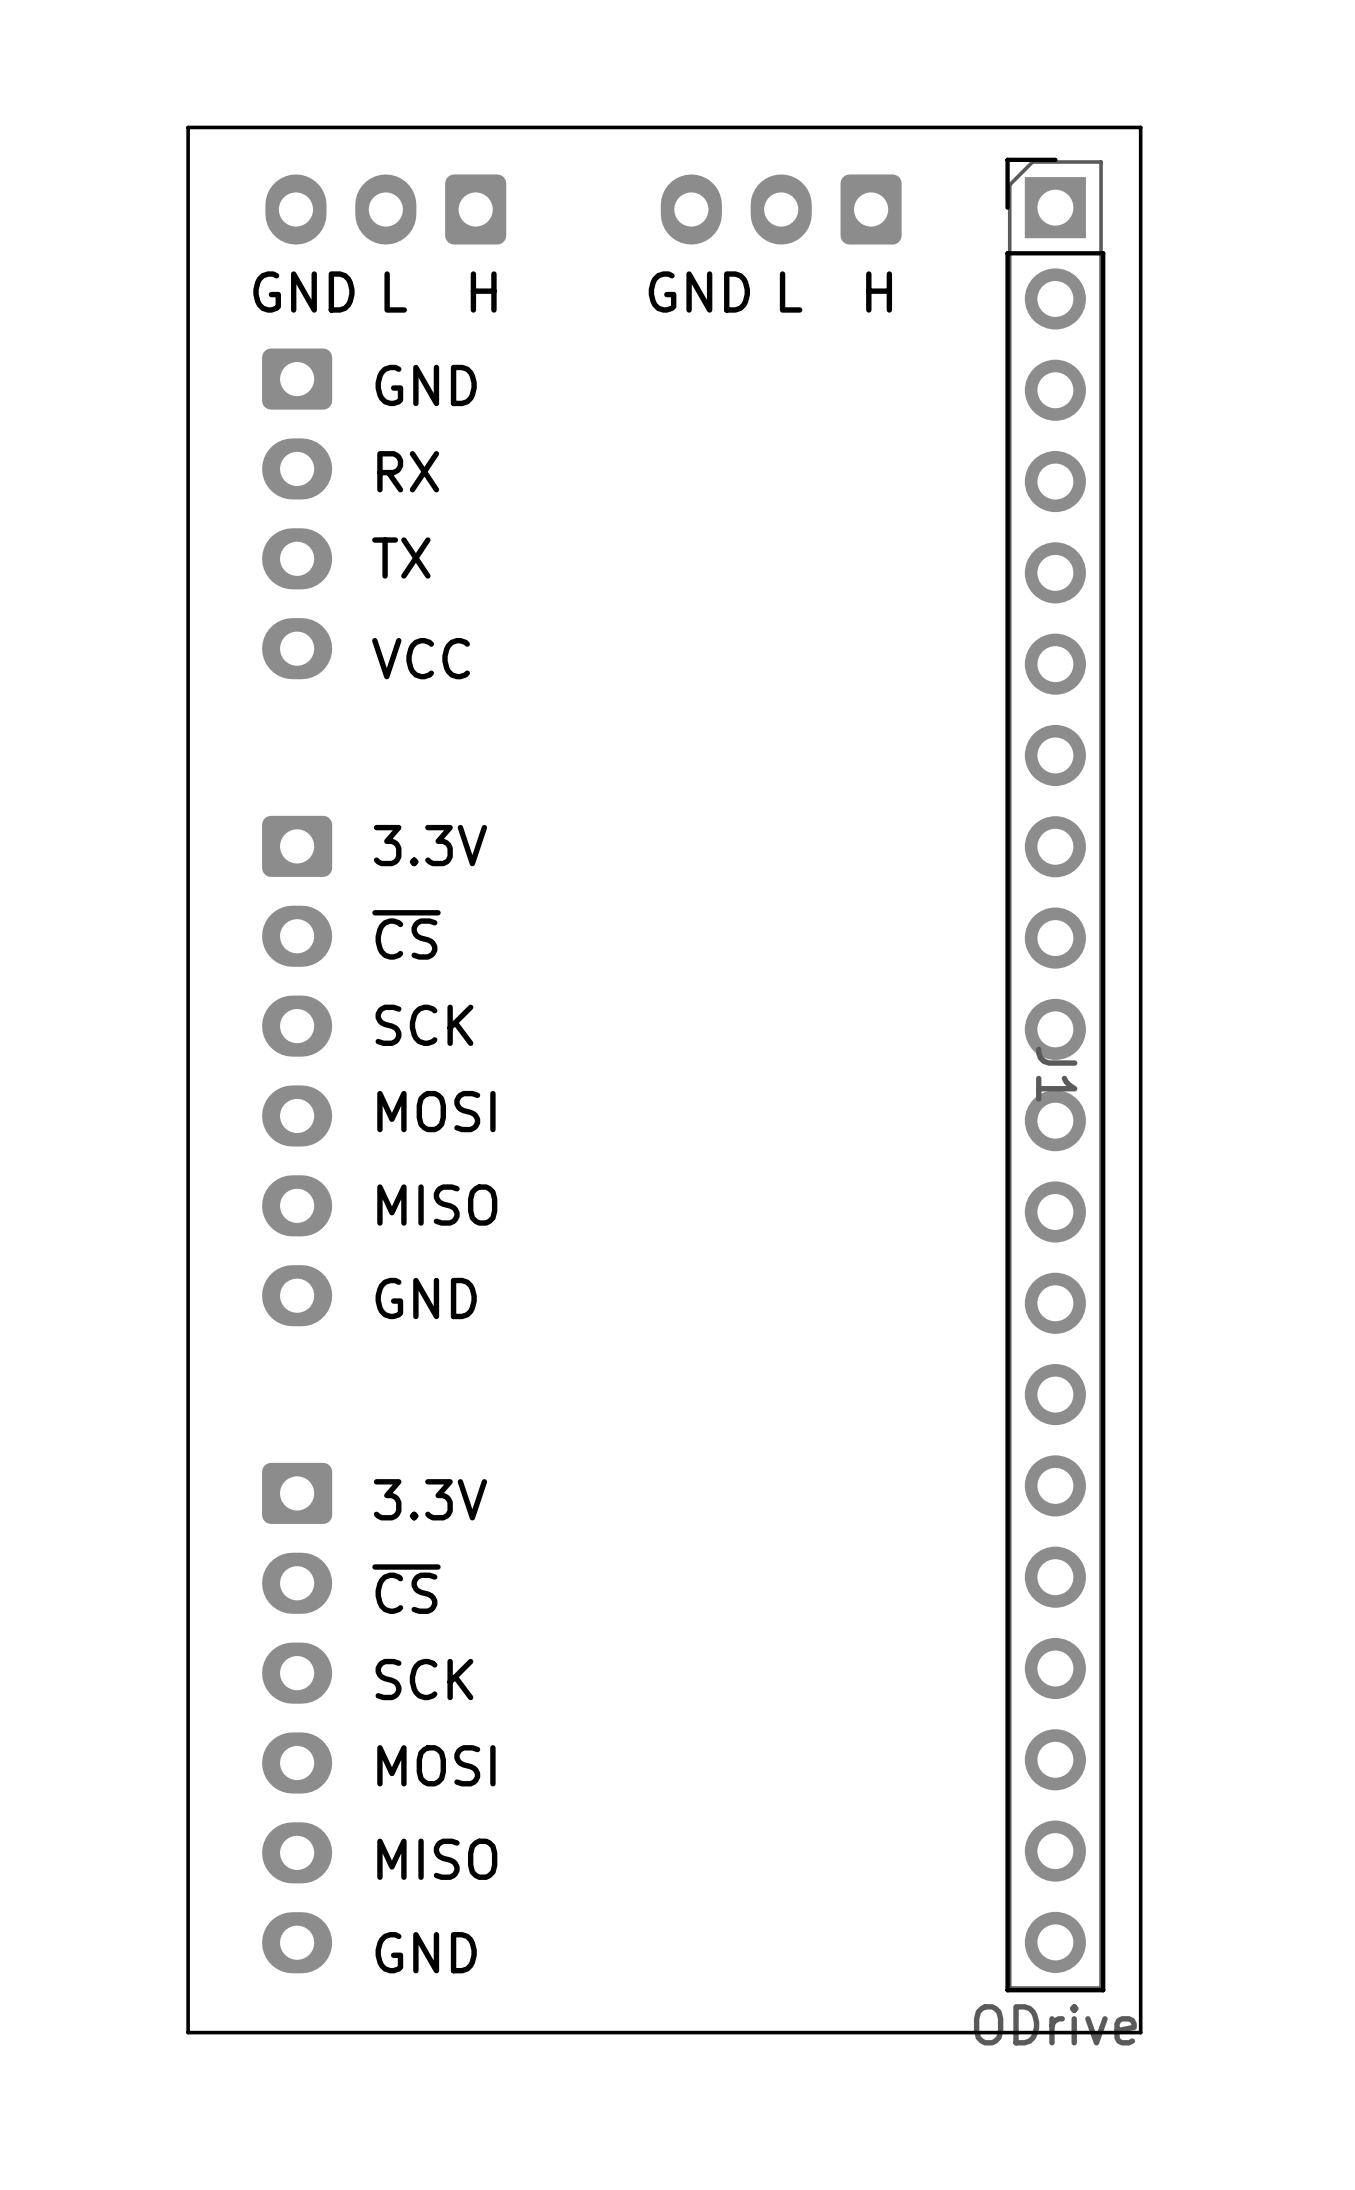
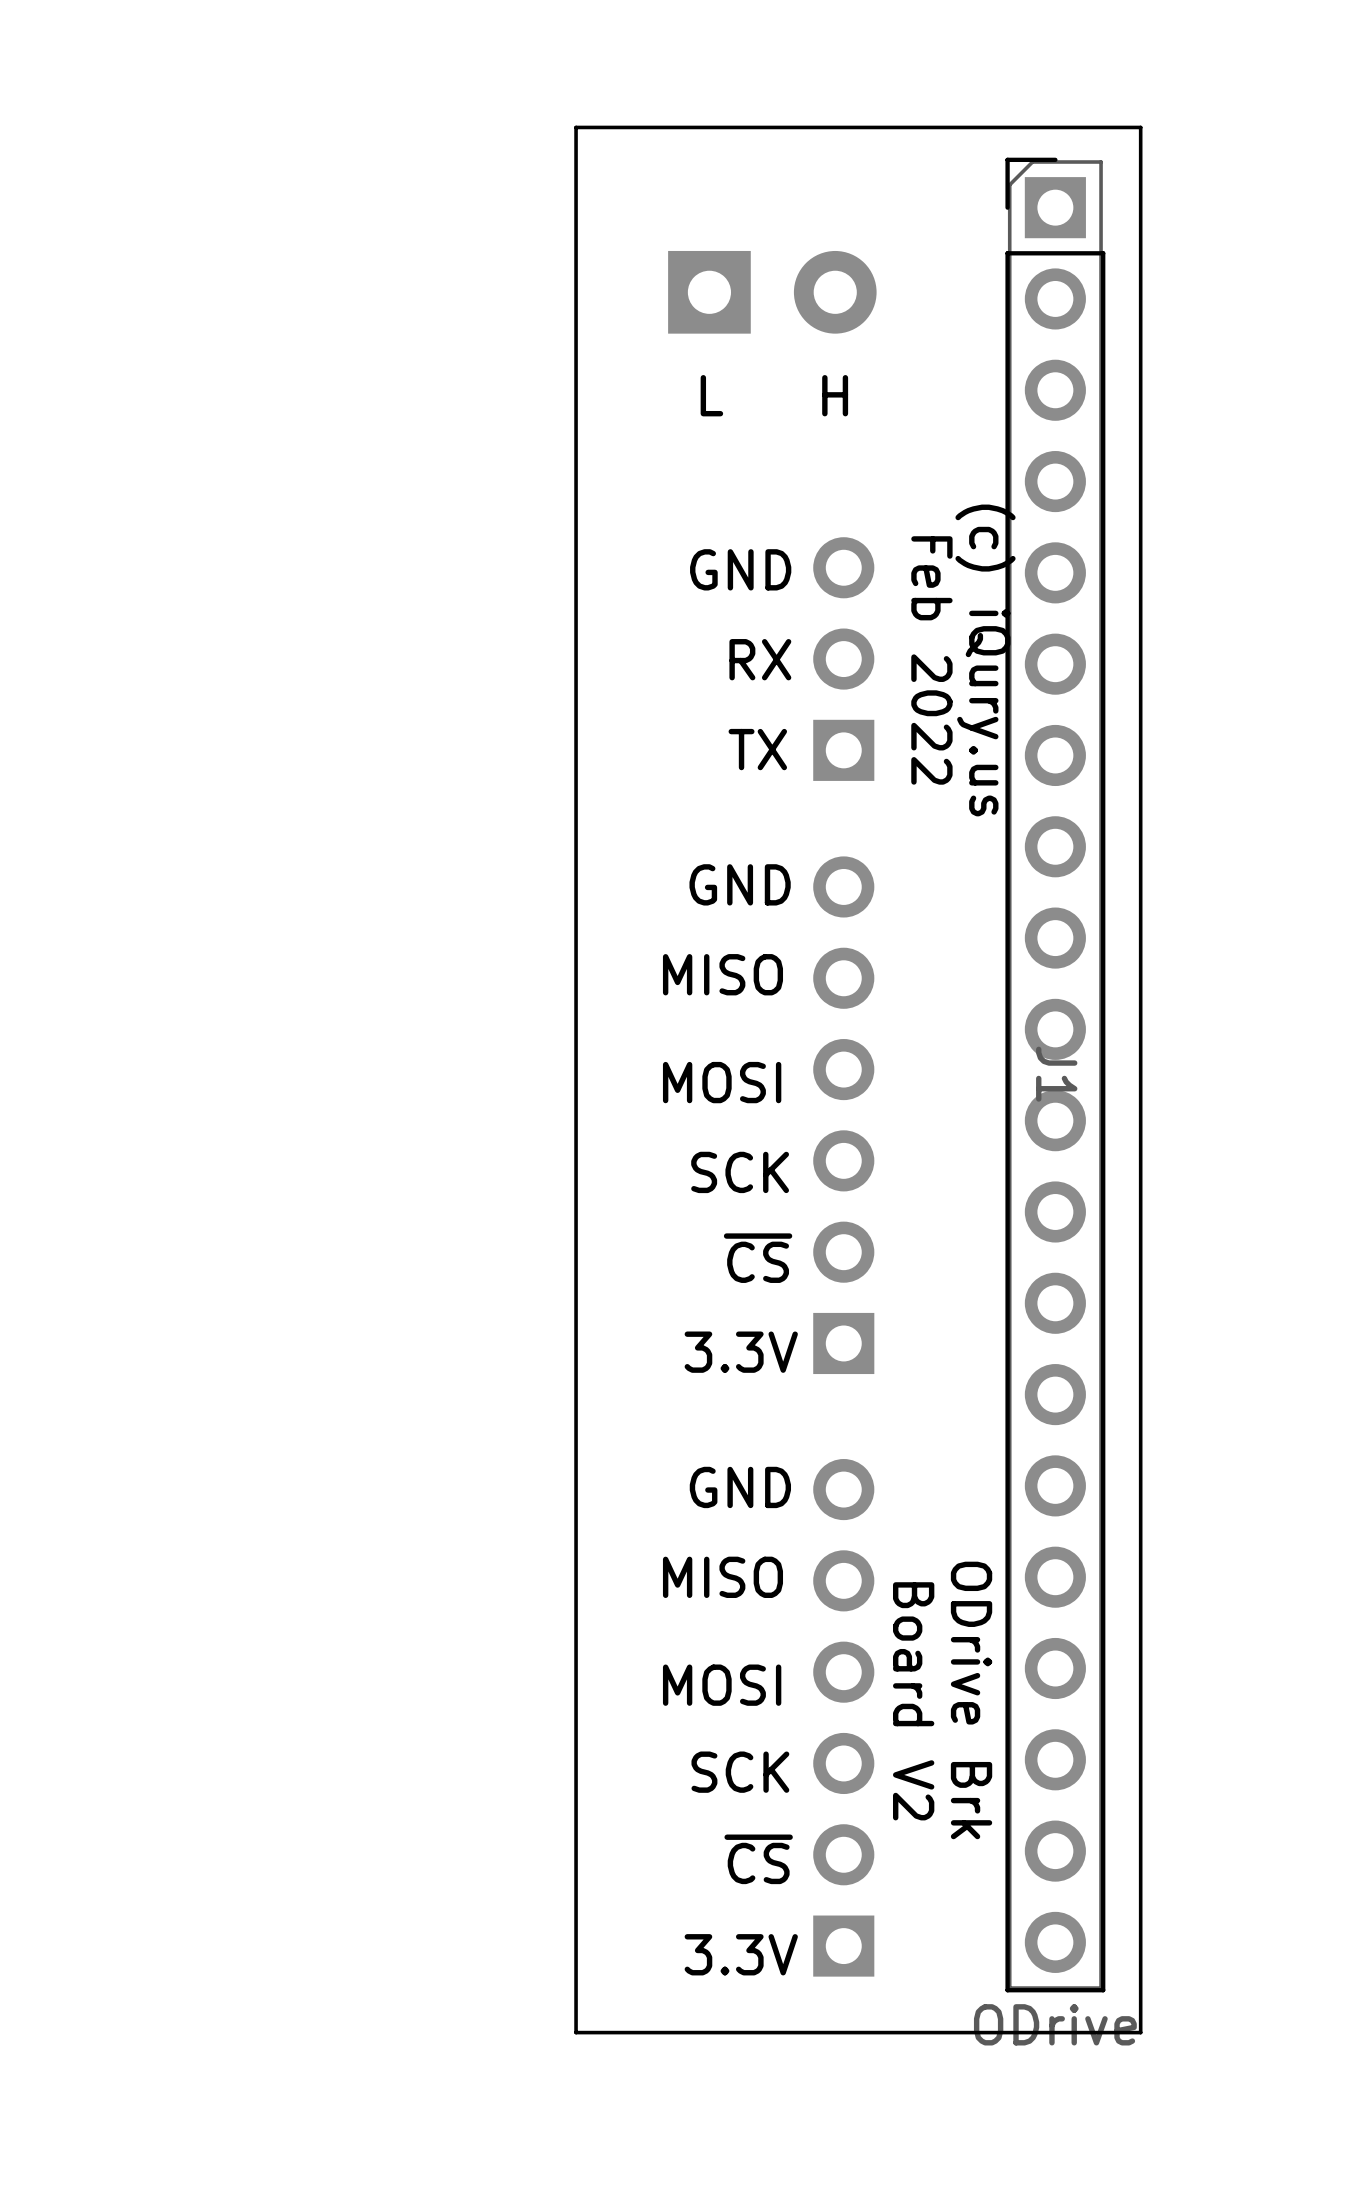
board edge: (576, 127) (188, 127) (188, 2032) (576, 2032) -> (576, 127) (576, 2032)
part: (385, 209) -> none
part: (781, 209) -> none
text: GND (303, 292) -> none
text: L (395, 292) -> none
text: H (483, 292) -> none
text: GND (699, 292) -> none
part: none -> (772, 292)
text position: L (791, 292) -> L (711, 395)
text position: H (879, 292) -> H (835, 395)
text: GND (426, 385) -> none
text position: RX (408, 471) -> RX (760, 659)
part: (297, 513) -> none
text position: TX (401, 558) -> TX (757, 749)
text: none -> GND (740, 569)
text: VCC (421, 658) -> none
part: none -> (843, 659)
text: none -> Feb 2022 (931, 660)
text: none -> (c) iQury.us (985, 660)
text: 3.3V (430, 845) -> none
text: none -> GND (740, 884)
text: ~{CS} (406, 934) -> none
text: none -> MISO (722, 974)
text: SCK (424, 1025) -> none
part: (297, 1071) -> none
text: none -> MOSI (722, 1082)
text: MOSI (436, 1111) -> none
part: none -> (843, 1115)
text: none -> SCK (740, 1172)
text: MISO (437, 1205) -> none
text: none -> ~{CS} (758, 1258)
text: GND (426, 1298) -> none
text: none -> 3.3V (741, 1352)
text: none -> GND (740, 1487)
text: 3.3V (430, 1499) -> none
text: none -> MISO (722, 1577)
text: ~{CS} (406, 1589) -> none
text: SCK (424, 1679) -> none
text: none -> MOSI (722, 1685)
text: none -> ODrive Brk (971, 1700)
text: none -> Board V2 (913, 1701)
part: none -> (843, 1717)
part: (297, 1718) -> none
text: MOSI (436, 1765) -> none
text: none -> SCK (740, 1772)
text: MISO (437, 1859) -> none
text: none -> ~{CS} (758, 1859)
text: GND (426, 1952) -> none
text: none -> 3.3V (741, 1954)

